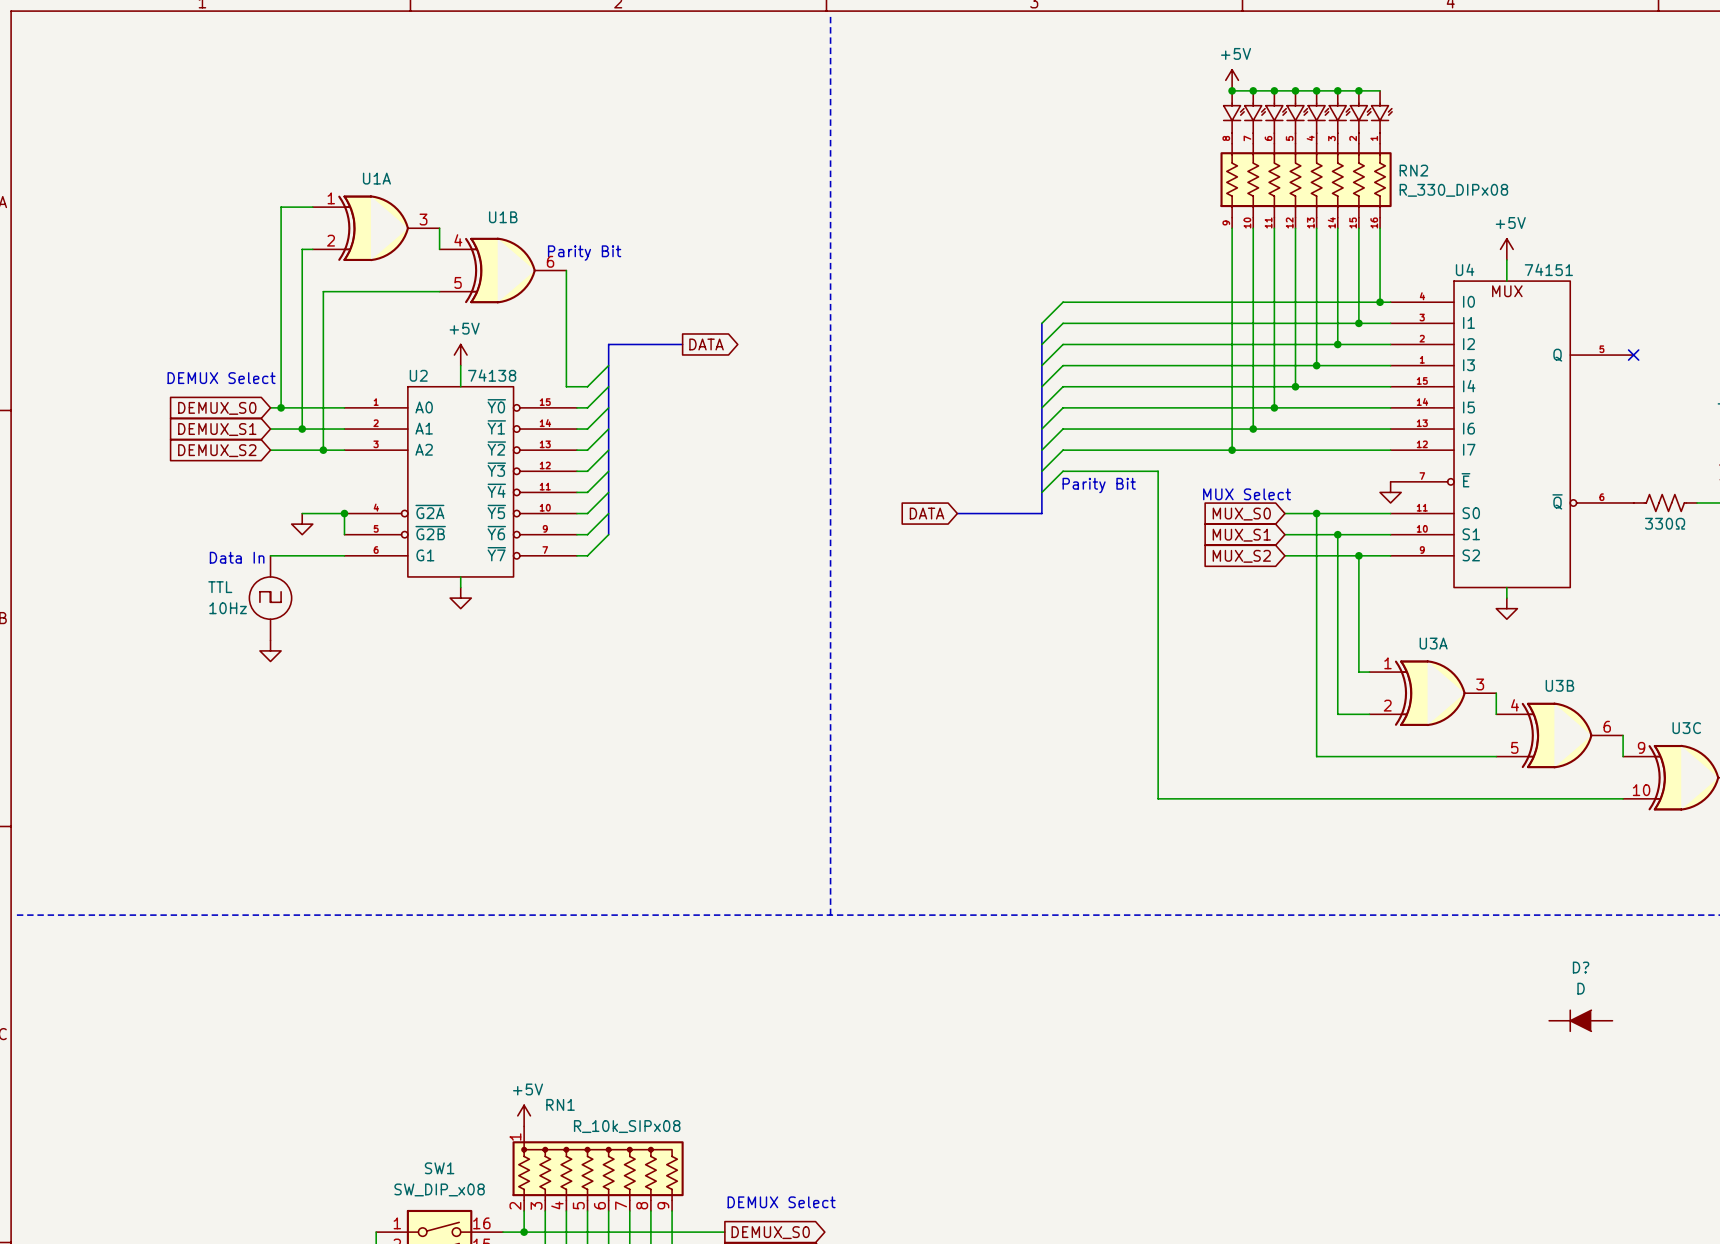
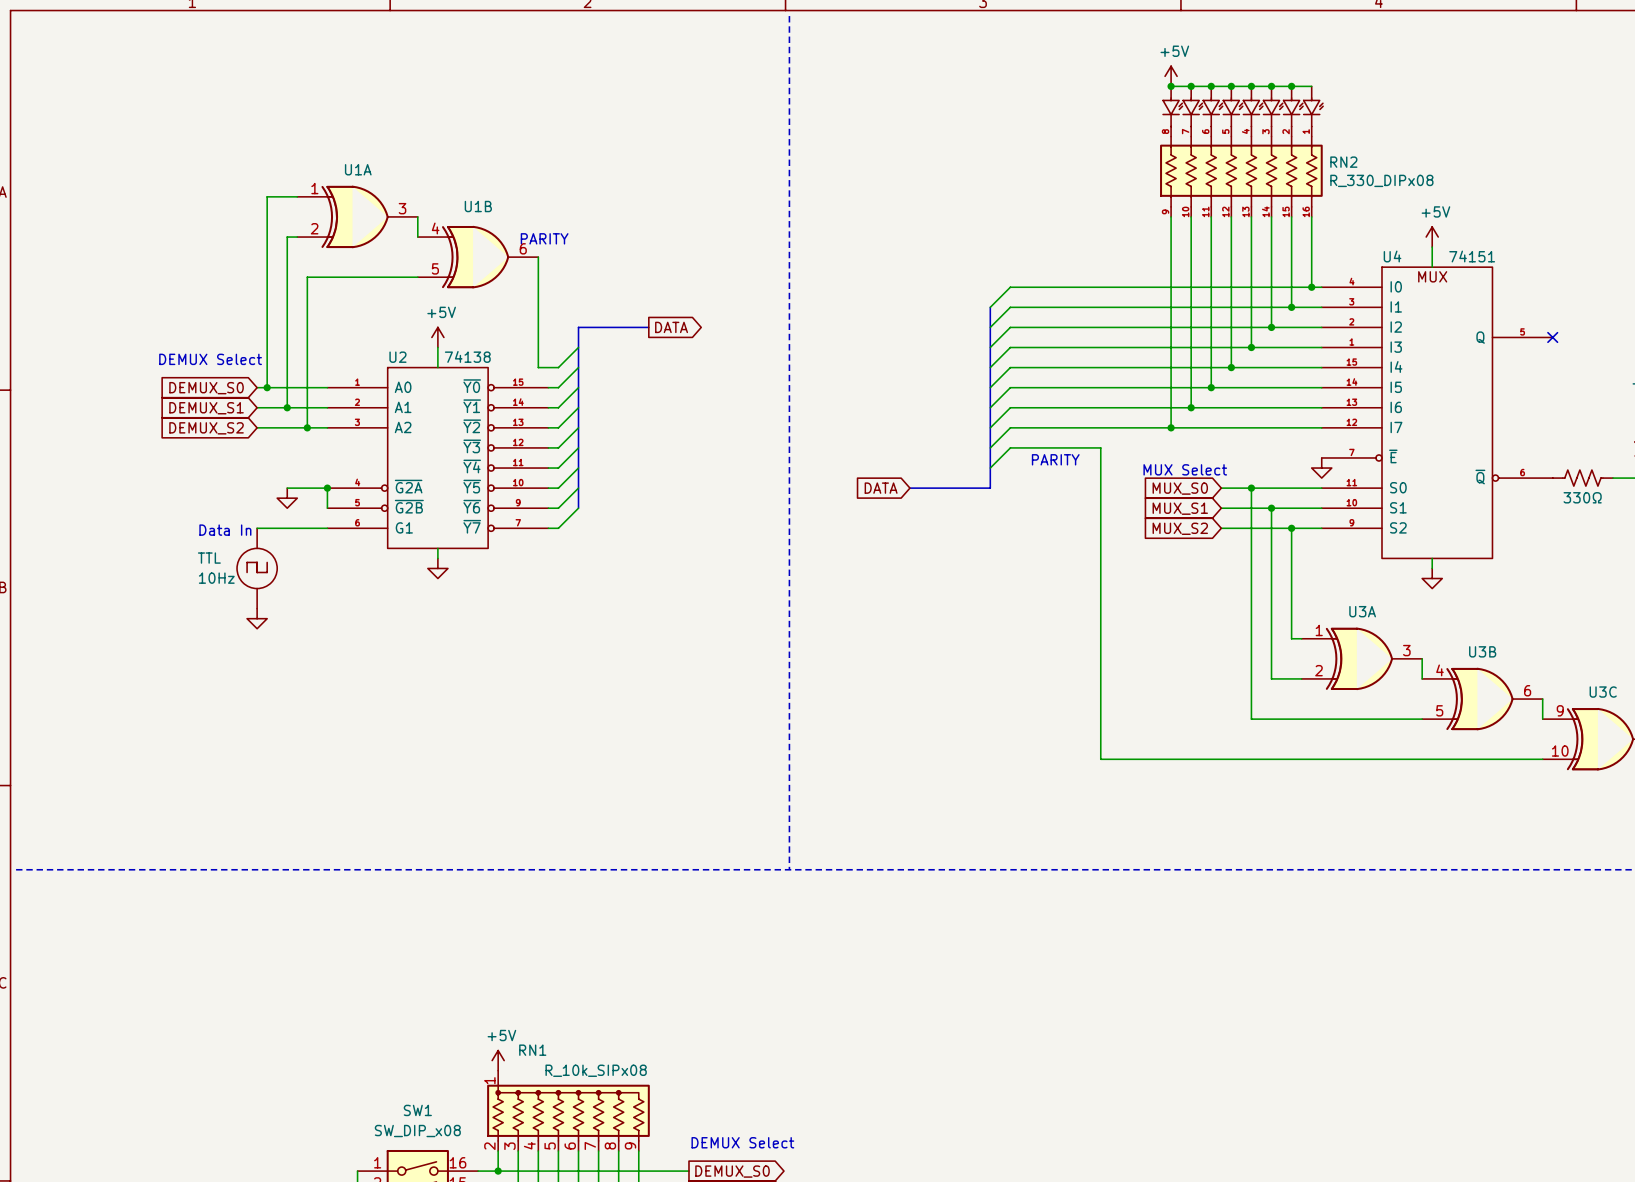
text: Parity Bit (584, 253) -> PARITY (544, 238)
text: Parity Bit (1099, 485) -> PARITY (1055, 459)
D?: D (1580, 1020) -> none

